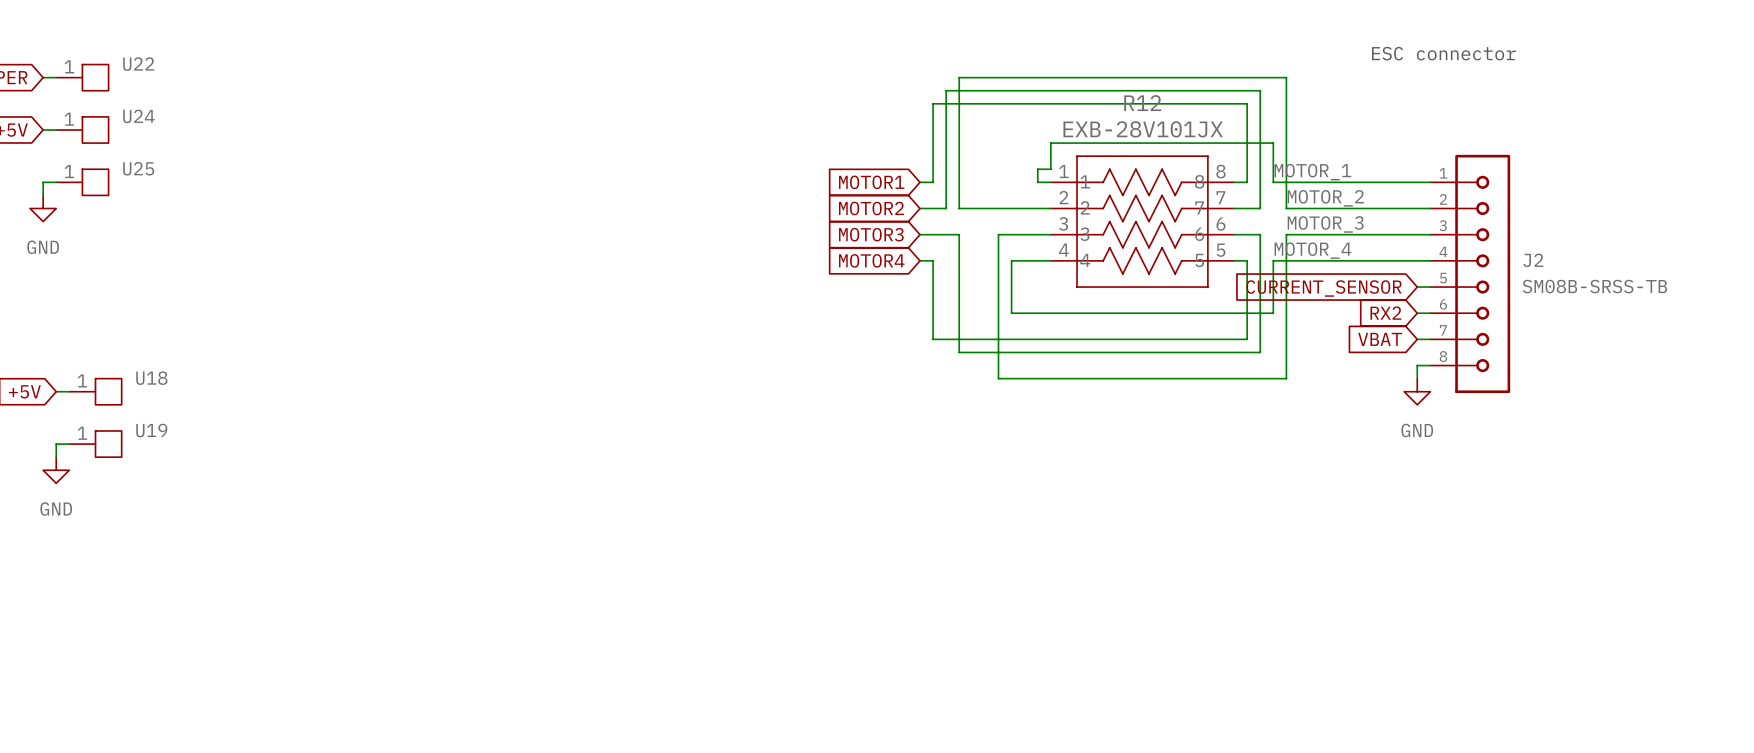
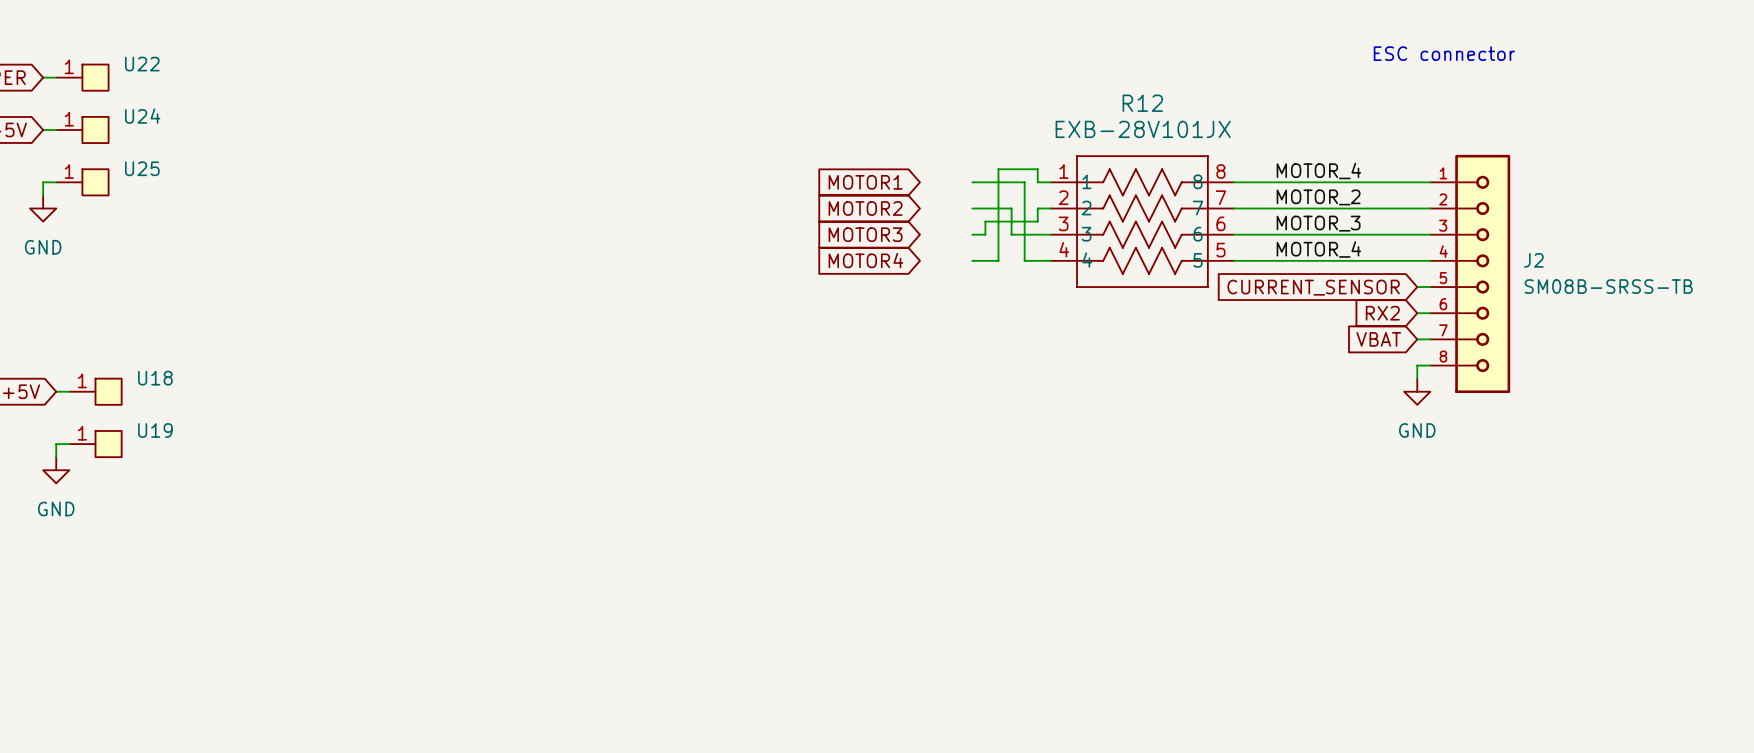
wire: (1037, 169) (1050, 169) (1050, 143) (1273, 143) (1273, 182) -> (1247, 182) (1273, 182)
wire: none -> (1037, 169) (998, 169) (998, 234)
label: MOTOR_1 (1312, 172) -> MOTOR_4 (1318, 170)
wire: (919, 182) (933, 182) (933, 103) (1247, 103) (1247, 182) -> none
wire: none -> (972, 182) (1024, 182) (1024, 260)
label position: MOTOR_2 (1325, 198) -> MOTOR_2 (1318, 197)
wire: (919, 208) (946, 208) (946, 90) (1260, 90) (1260, 208) -> none
wire: (972, 208) (959, 208) (959, 77) (1286, 77) (1286, 208) -> (1260, 208) (1286, 208)
wire: (1011, 208) (1037, 208) -> (972, 234) (985, 234) (985, 221) (1037, 221) (1037, 208)
label position: MOTOR_3 (1325, 224) -> MOTOR_3 (1318, 223)
wire: (919, 234) (959, 234) (959, 352) (1260, 352) (1260, 234) -> none
wire: (998, 234) (1011, 234) -> (1011, 208) (1011, 234)
wire: (1286, 234) (1286, 378) (998, 378) (998, 260) -> (1286, 234) (1260, 234)
wire: (919, 260) (933, 260) (933, 339) (1247, 339) (1247, 260) -> none
wire: none -> (972, 260) (998, 260)
wire: (1024, 260) (1011, 260) (1011, 313) (1273, 313) (1273, 260) -> (1247, 260) (1273, 260)

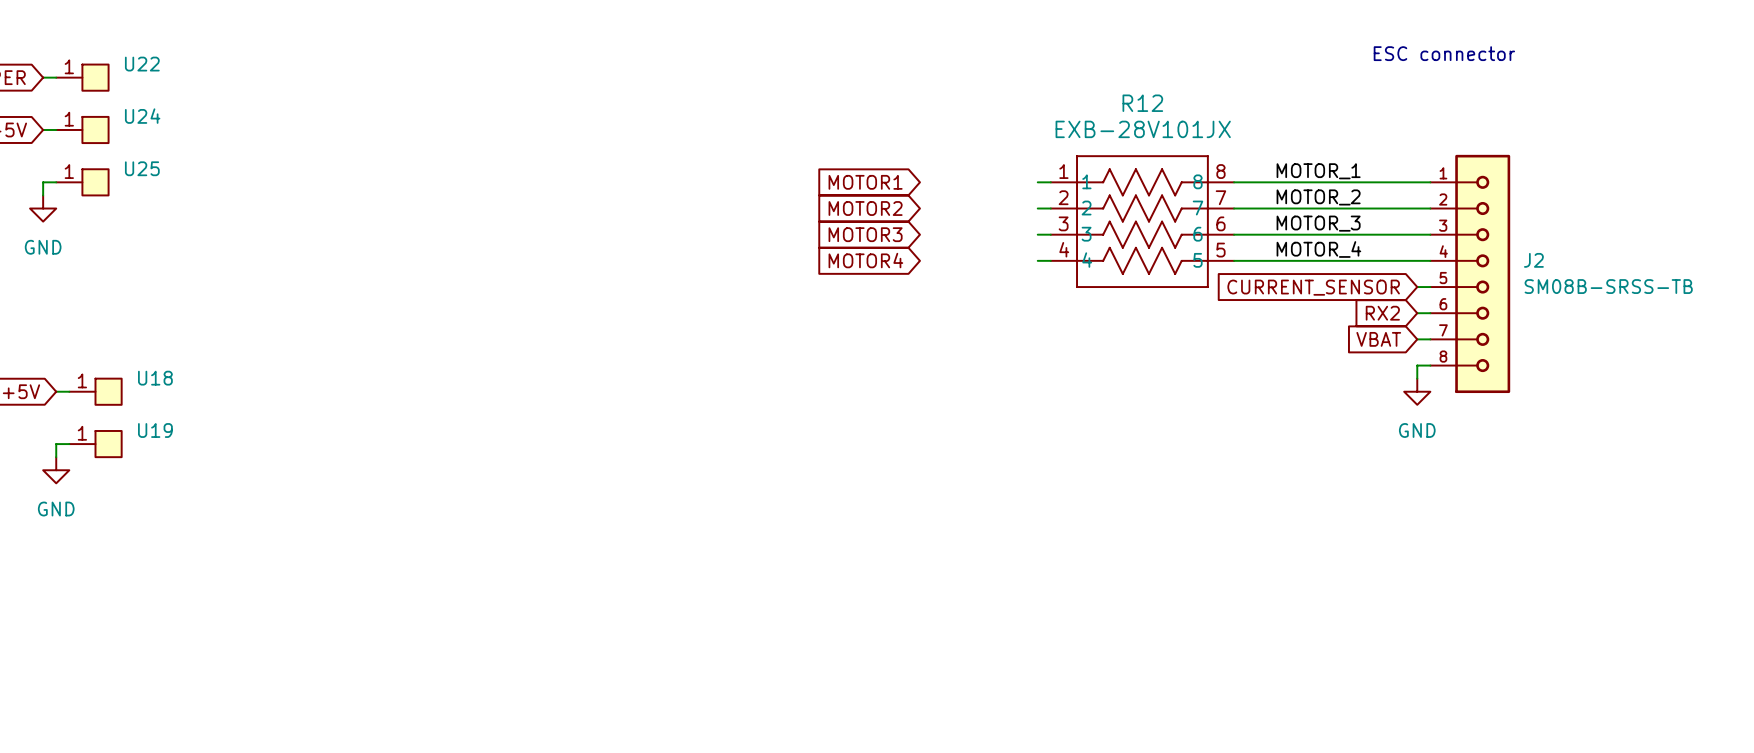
label: MOTOR_4 (1318, 170) -> MOTOR_1 (1318, 171)
wire: (972, 182) (1024, 182) (1024, 260) (1037, 260) -> none
wire: (1037, 182) (1037, 169) (998, 169) (998, 260) (972, 260) -> none
wire: (972, 208) (1011, 208) (1011, 234) (1037, 234) -> none
wire: (1037, 208) (1037, 221) (985, 221) (985, 234) (972, 234) -> none

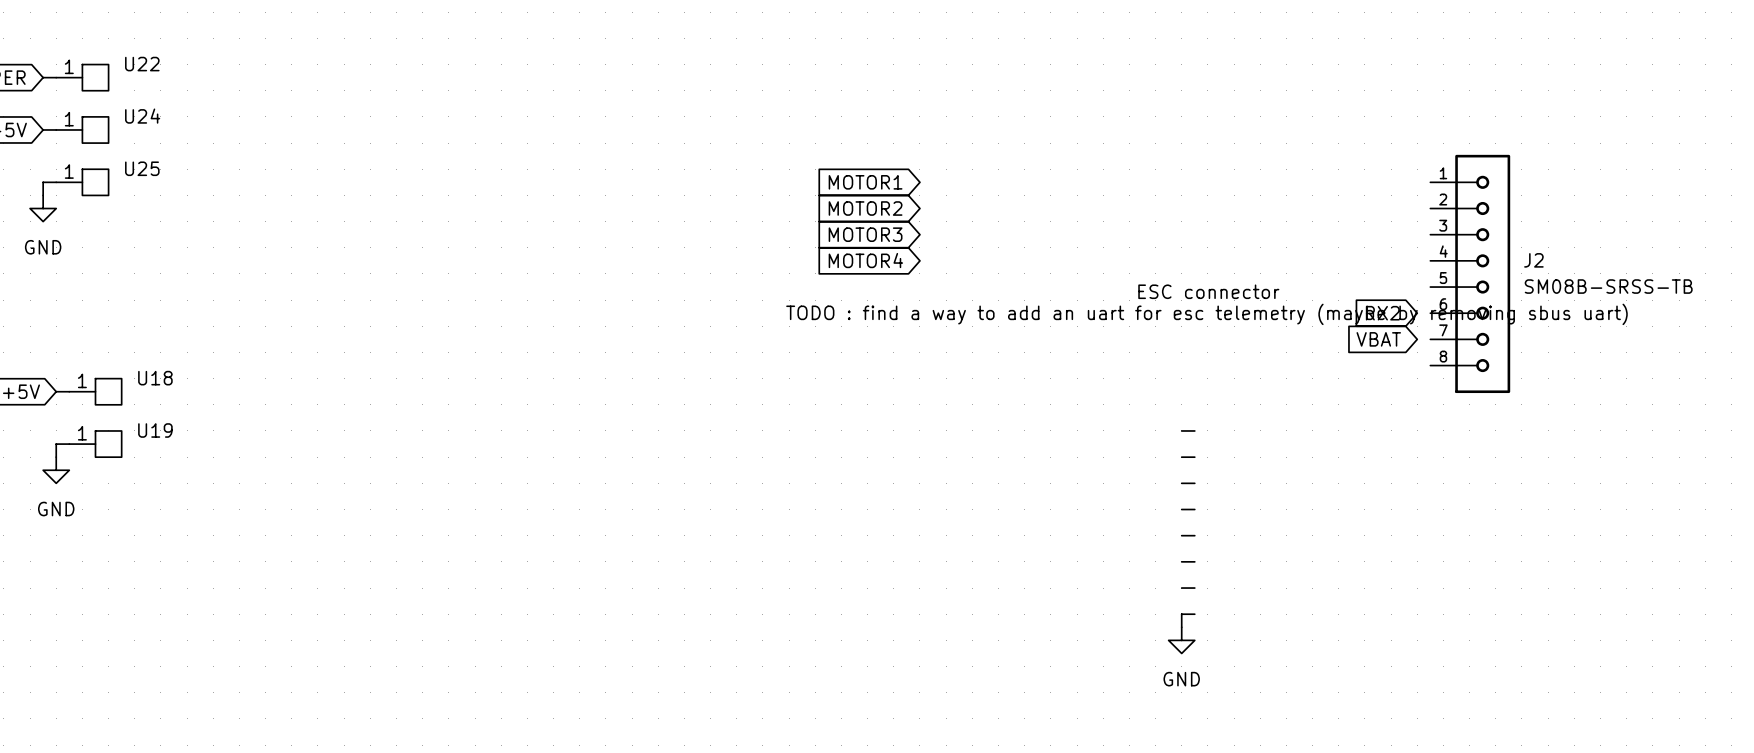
text: ESC connector (1444, 53) -> none
label: MOTOR_1 (1318, 171) -> none
wire: (1037, 182) (1050, 182) -> none
wire: (1234, 182) (1430, 182) -> none
label: MOTOR_2 (1318, 197) -> none
wire: (1037, 208) (1050, 208) -> none
wire: (1234, 208) (1430, 208) -> none
R12: EXB-28V101JX (1142, 221) -> none
label: MOTOR_3 (1318, 223) -> none
wire: (1037, 234) (1050, 234) -> (1181, 430) (1194, 430)
wire: (1234, 234) (1430, 234) -> none
label: MOTOR_4 (1318, 249) -> none
wire: (1037, 260) (1050, 260) -> (1181, 457) (1194, 457)
wire: (1234, 260) (1430, 260) -> none
global label: CURRENT_SENSOR (1313, 287) -> none
wire: (1417, 287) (1430, 287) -> none
text: none -> ESC connector (1208, 291)
wire: (1417, 313) (1430, 313) -> none
text: none -> TODO : find a way to add an uart for esc telemetry (maybe by removing sbus uart) (1206, 314)
wire: (1417, 339) (1430, 339) -> none
wire: (1430, 365) (1417, 365) (1417, 378) -> none
power symbol: GND (1417, 391) -> none
wire: none -> (1181, 483) (1194, 483)
wire: none -> (1181, 509) (1194, 509)
wire: none -> (1181, 535) (1194, 535)
wire: none -> (1181, 561) (1194, 561)
wire: none -> (1181, 588) (1194, 588)
wire: none -> (1194, 614) (1181, 614) (1181, 627)
power symbol: none -> GND (1181, 640)

